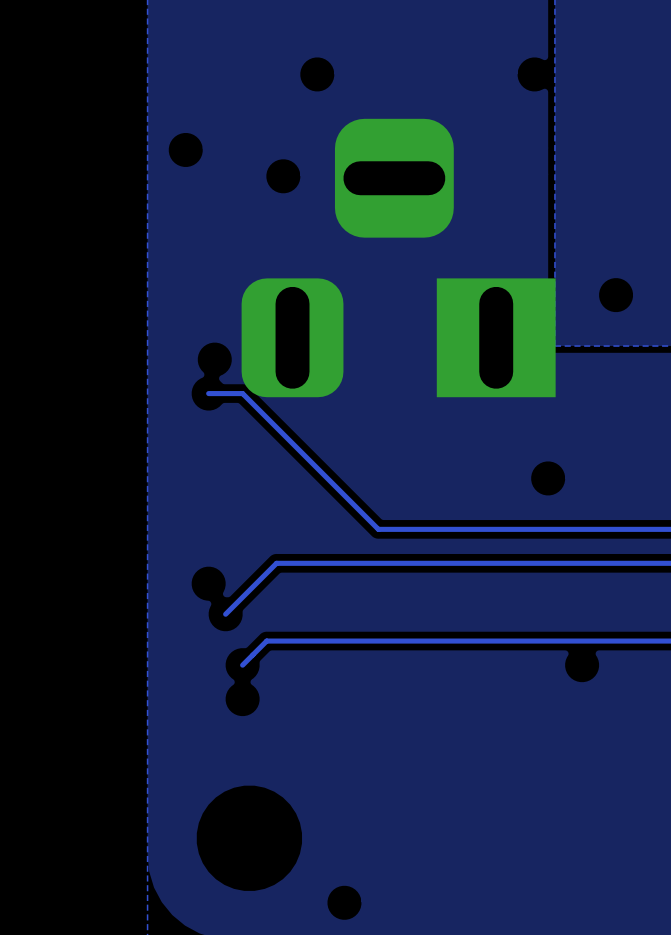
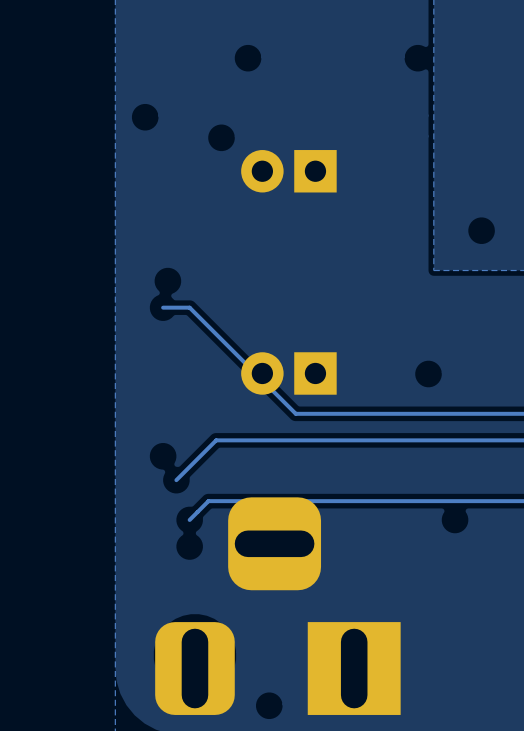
part: none -> (288, 171)
part position: (398, 258) -> (277, 606)
part: none -> (288, 373)

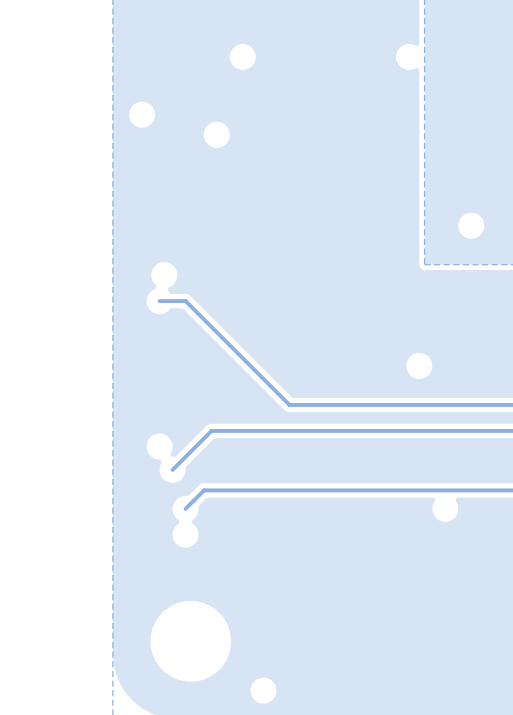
part: (288, 171) -> none
part: (288, 373) -> none
part: (277, 606) -> none

